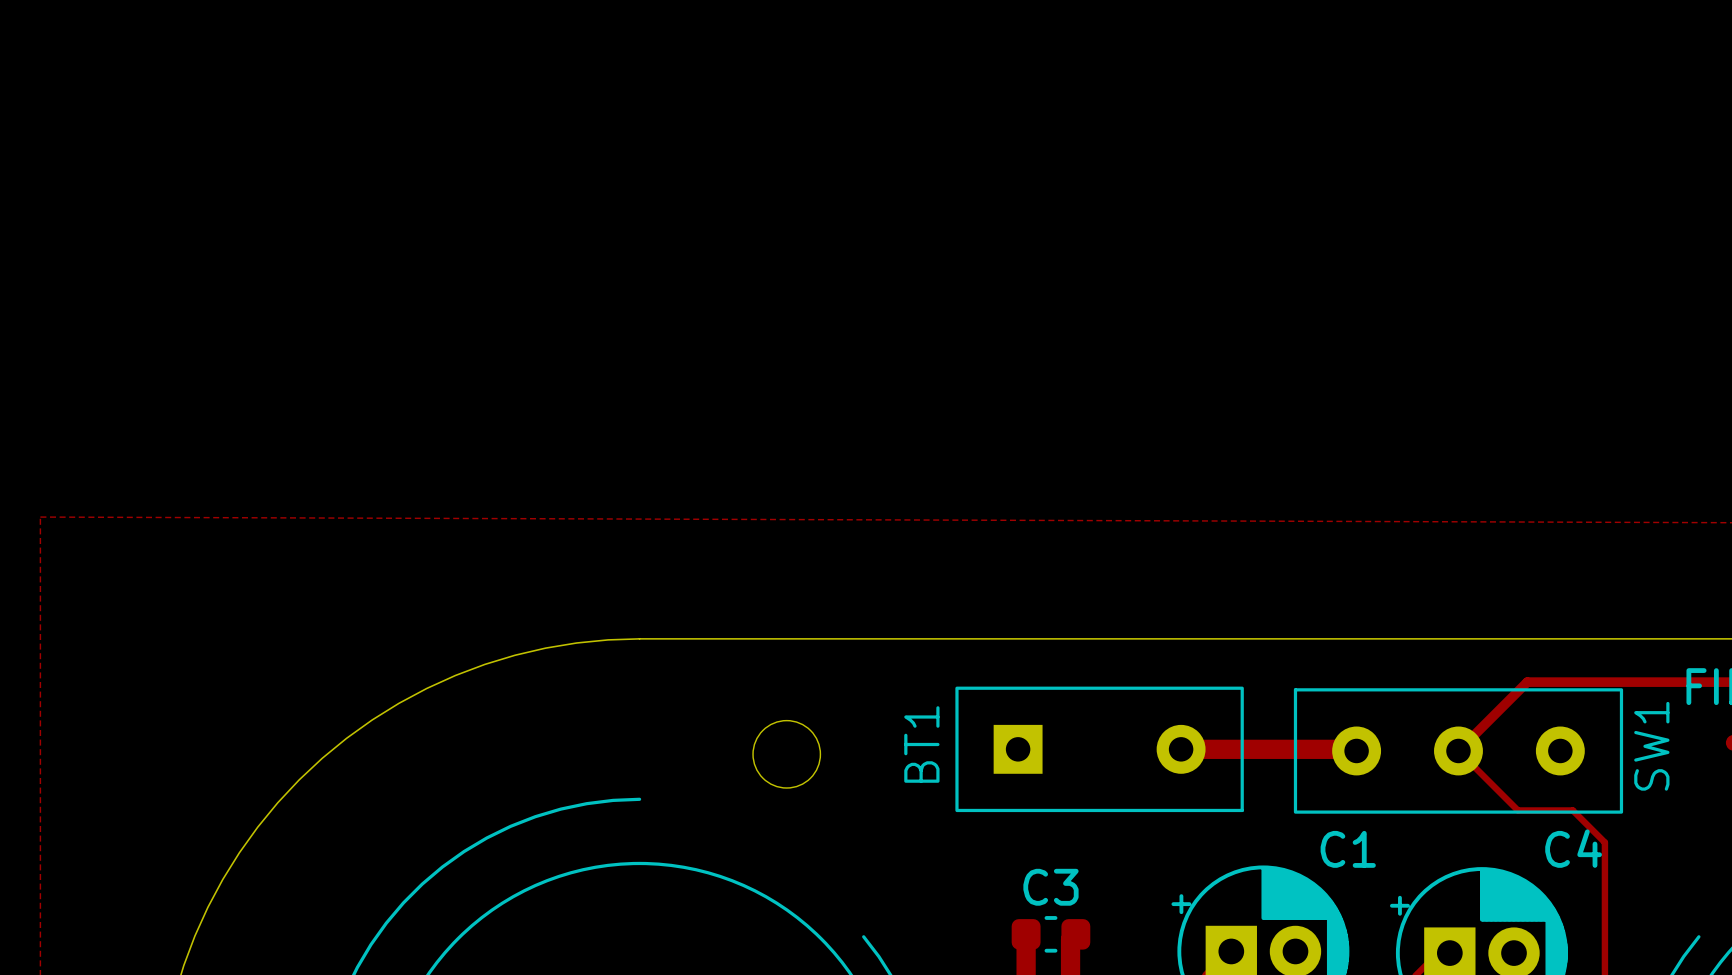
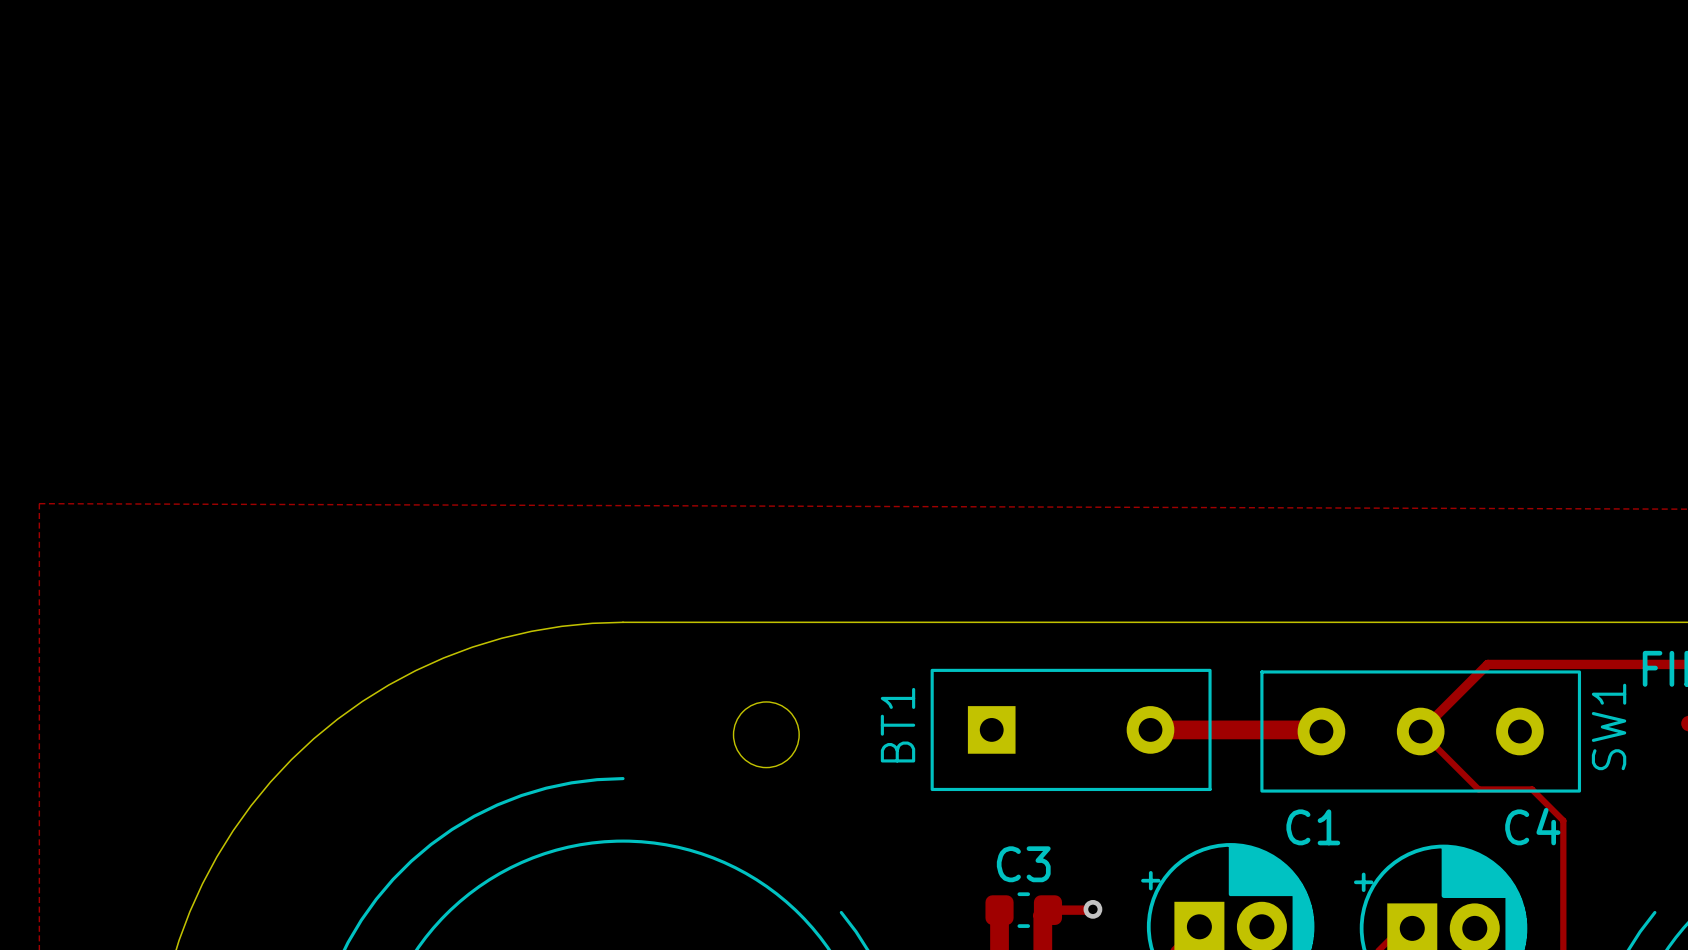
top track: none -> (1092, 909) (1047, 910)
via: none -> (1092, 909)

